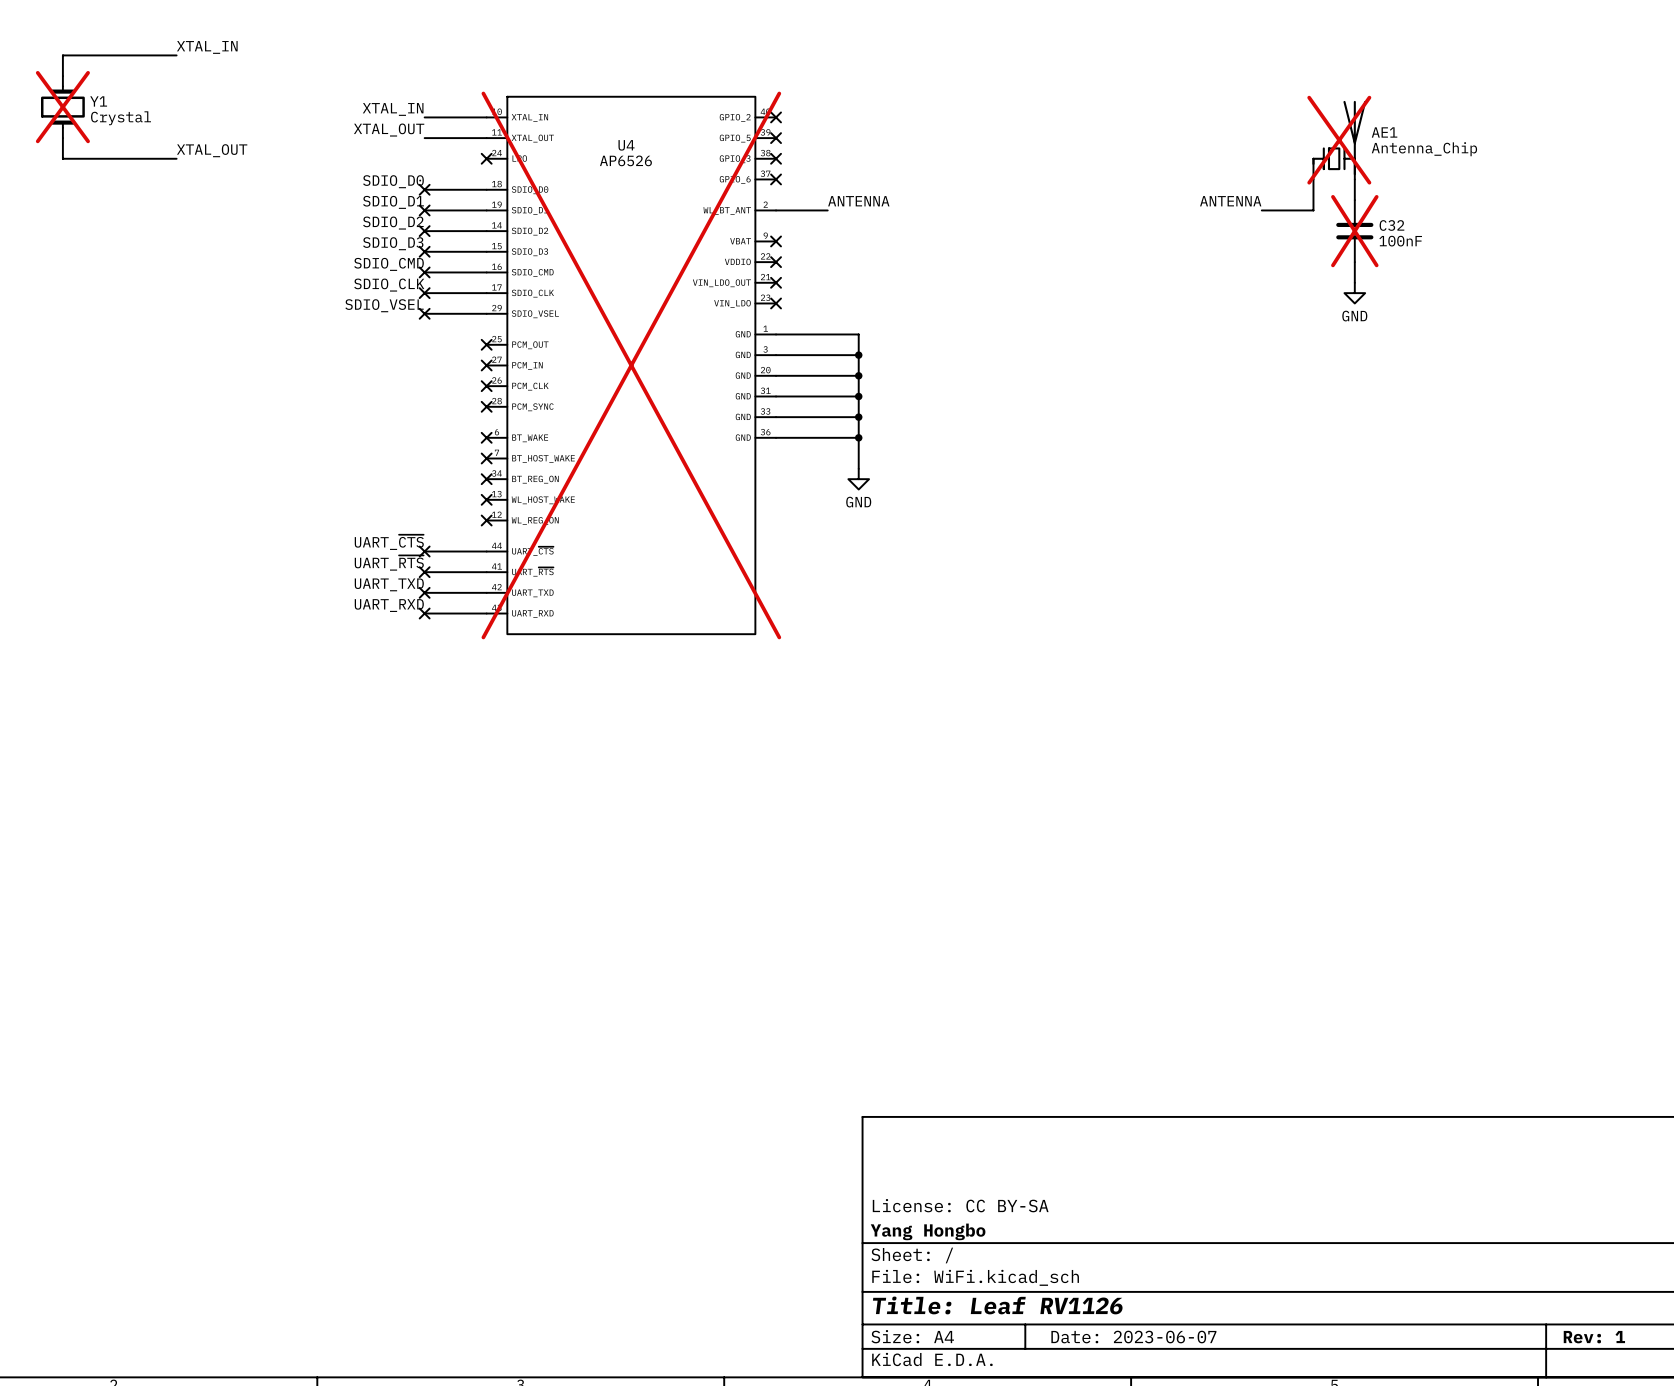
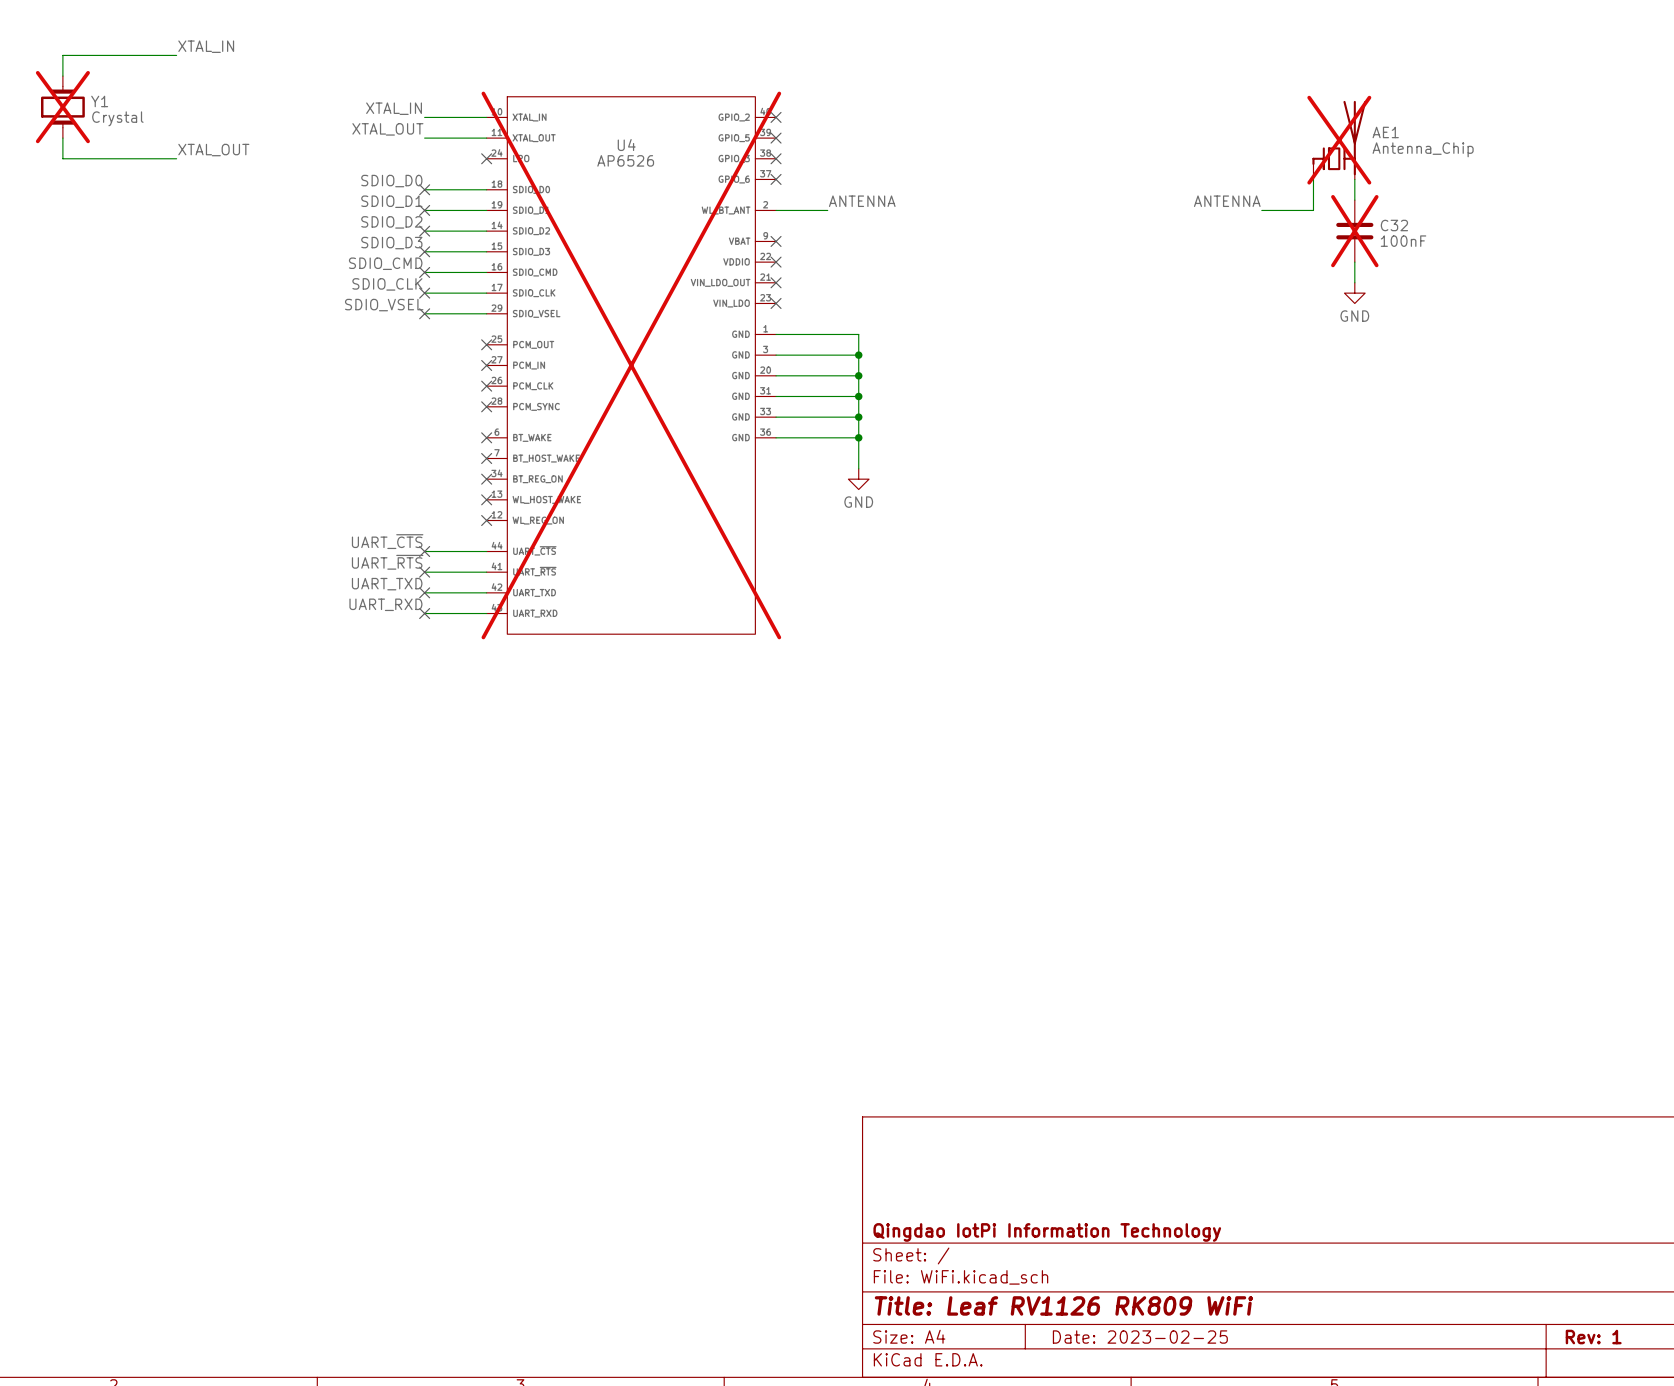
title block: License: CC BY-SA (960, 1205) -> none
title block: Yang Hongbo (928, 1231) -> Qingdao IotPi Information Technology (1047, 1232)
title block: Title: Leaf RV1126 (997, 1305) -> Title: Leaf RV1126 RK809 WiFi (1063, 1305)
title block: Date: 2023-06-07 (1133, 1337) -> Date: 2023-02-25 (1140, 1337)

